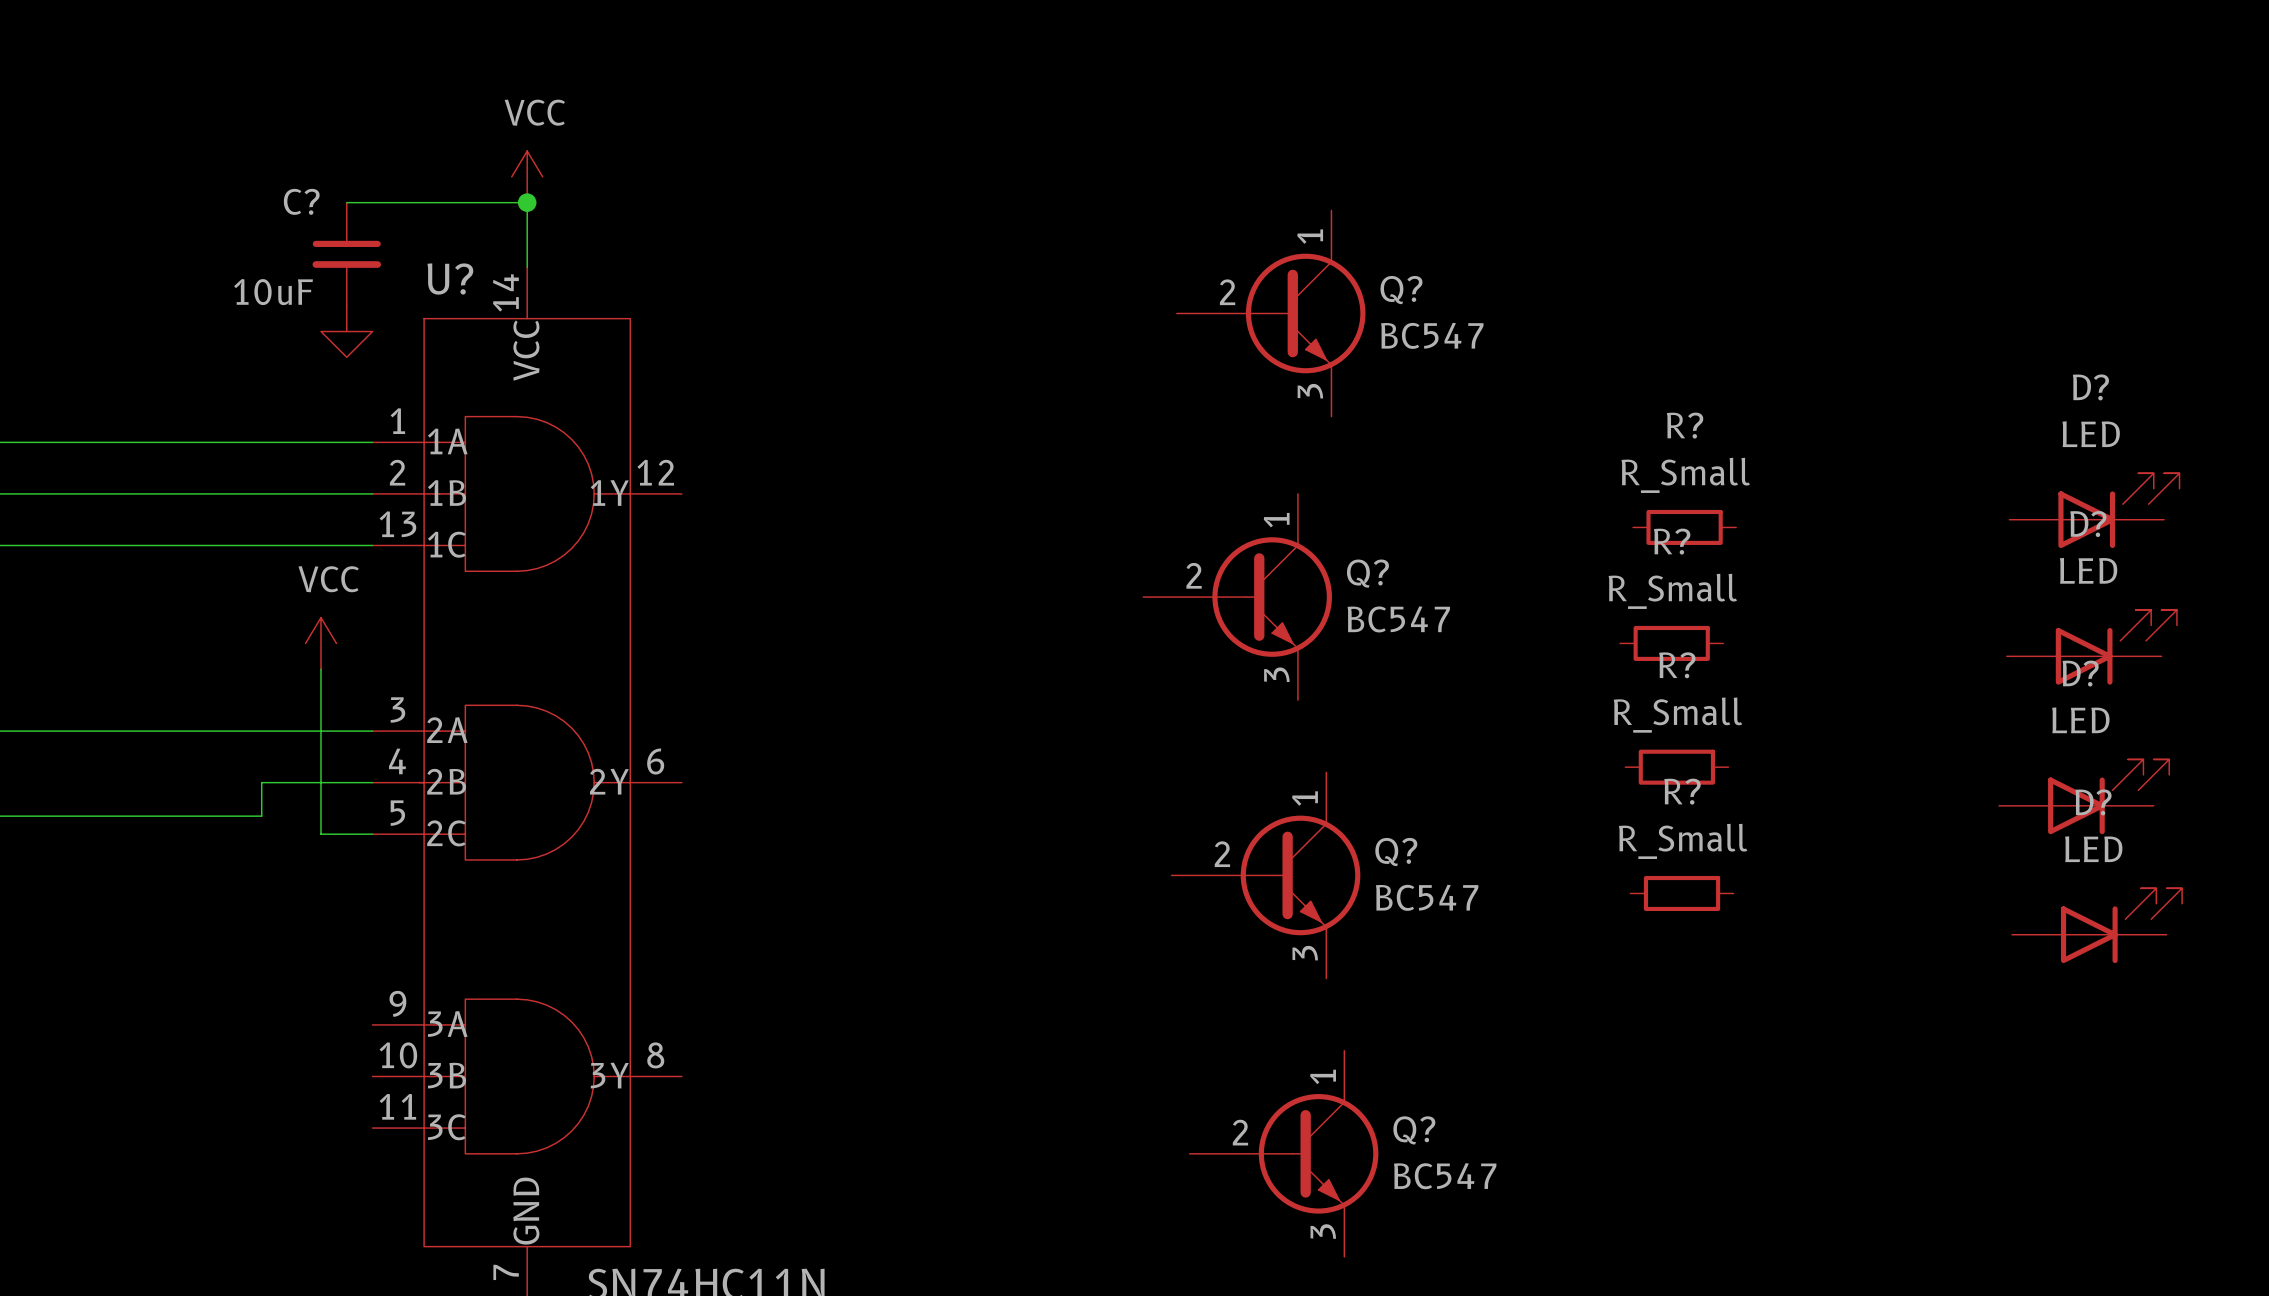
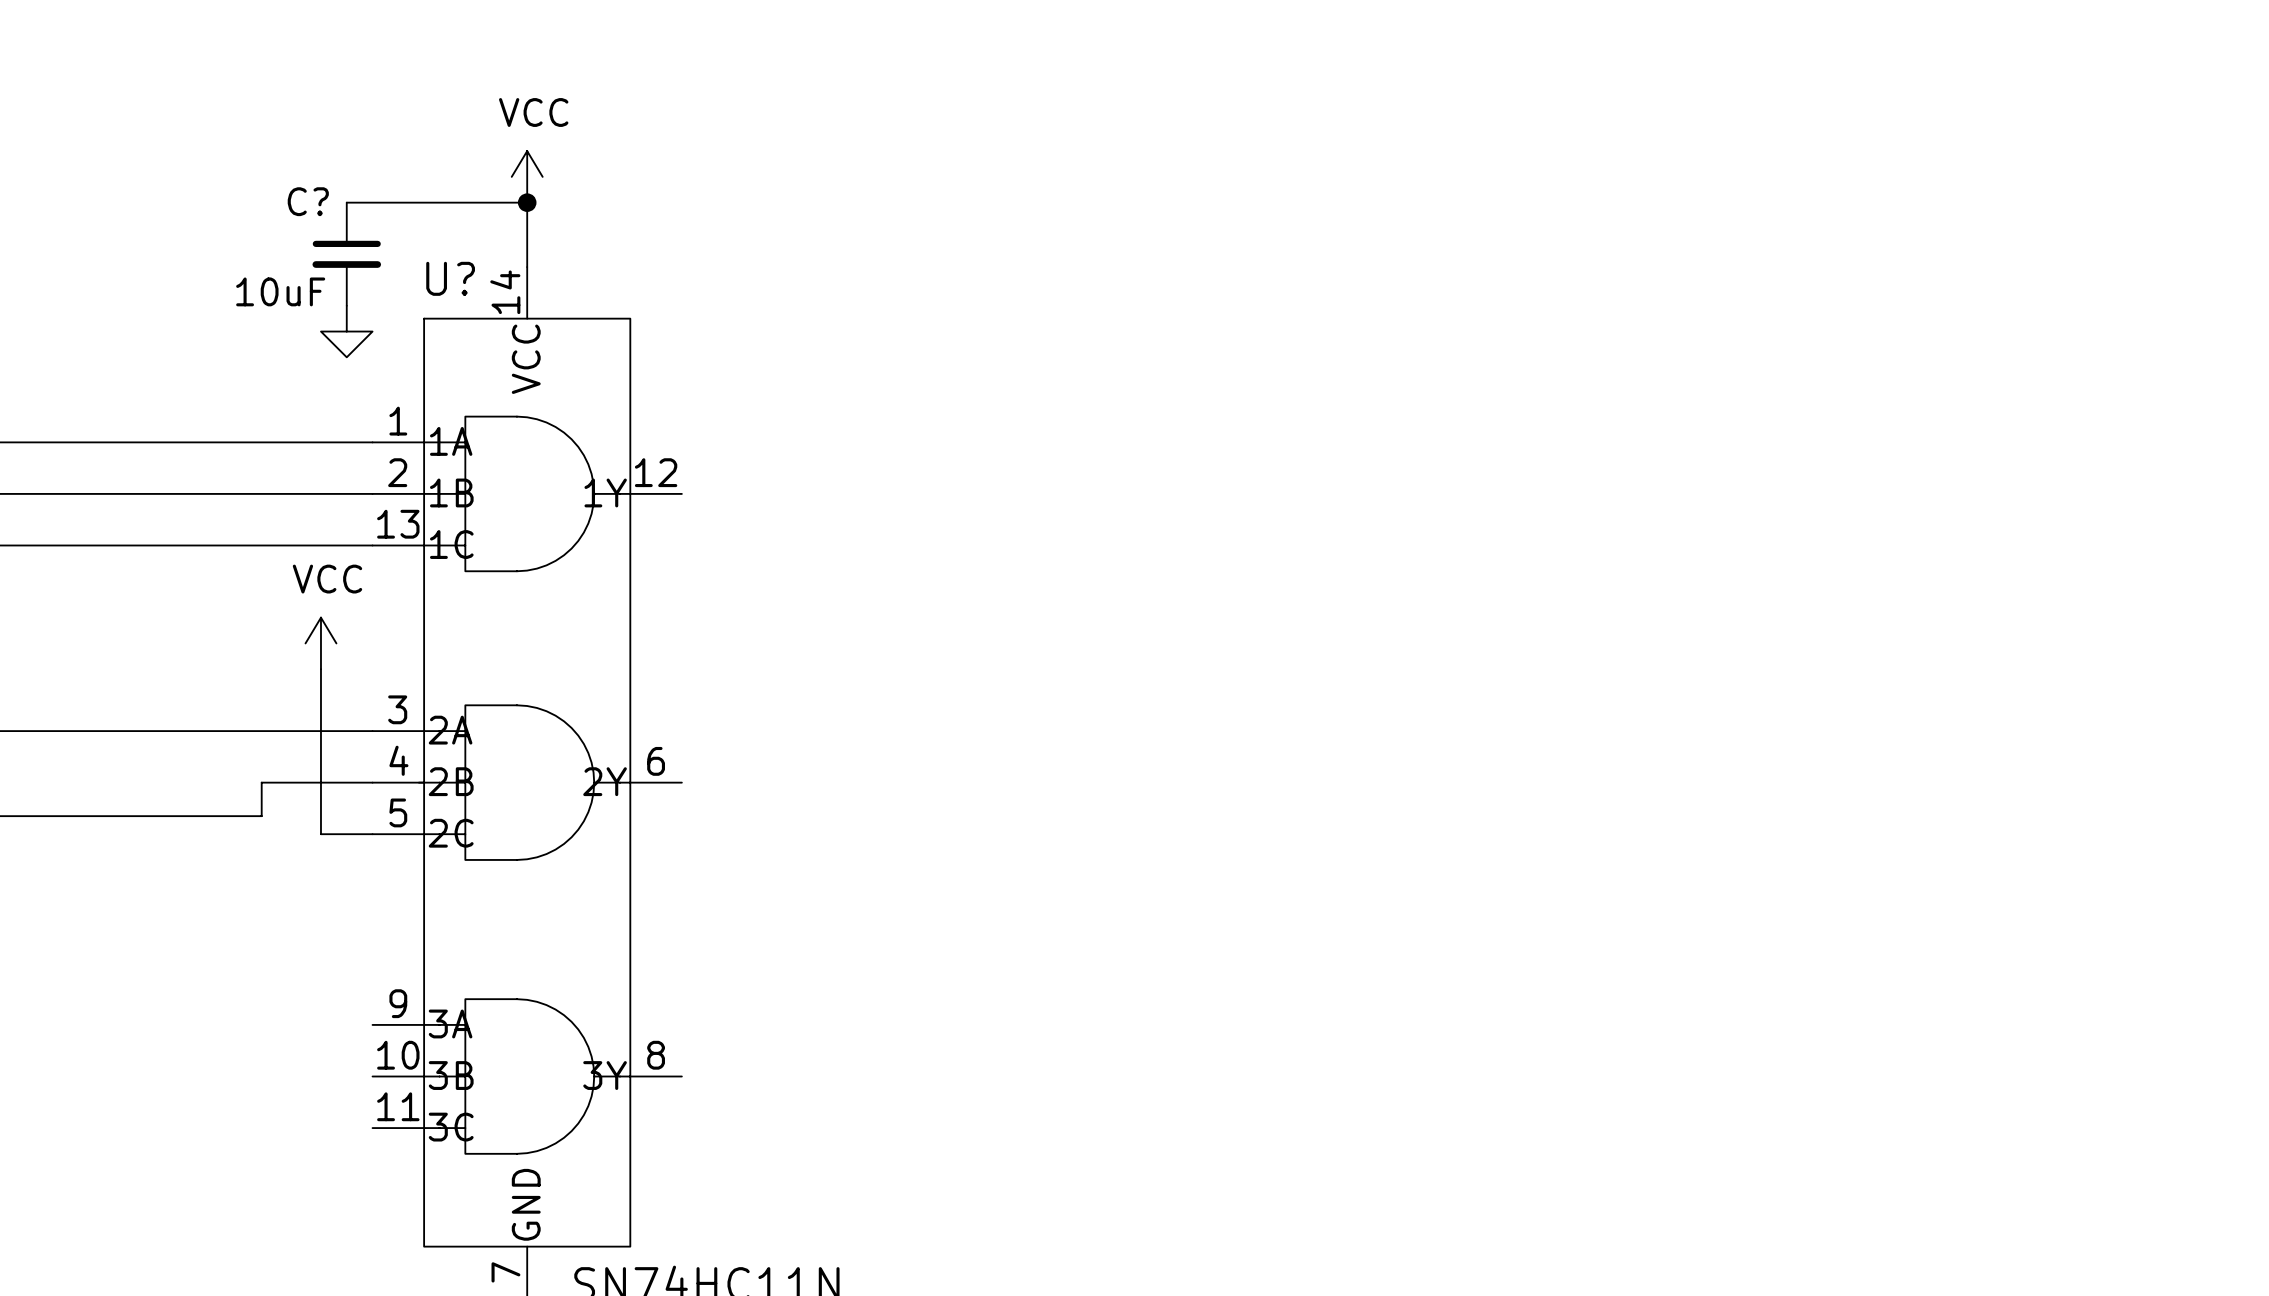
Q?: BC547 (1271, 313) -> none
D?: LED (2094, 510) -> none
R?: R_Small (1684, 527) -> none
Q?: BC547 (1237, 597) -> none
R?: R_Small (1671, 643) -> none
D?: LED (2091, 647) -> none
R?: R_Small (1676, 767) -> none
D?: LED (2084, 796) -> none
Q?: BC547 (1265, 875) -> none
R?: R_Small (1682, 893) -> none
D?: LED (2097, 925) -> none
Q?: BC547 (1284, 1153) -> none

